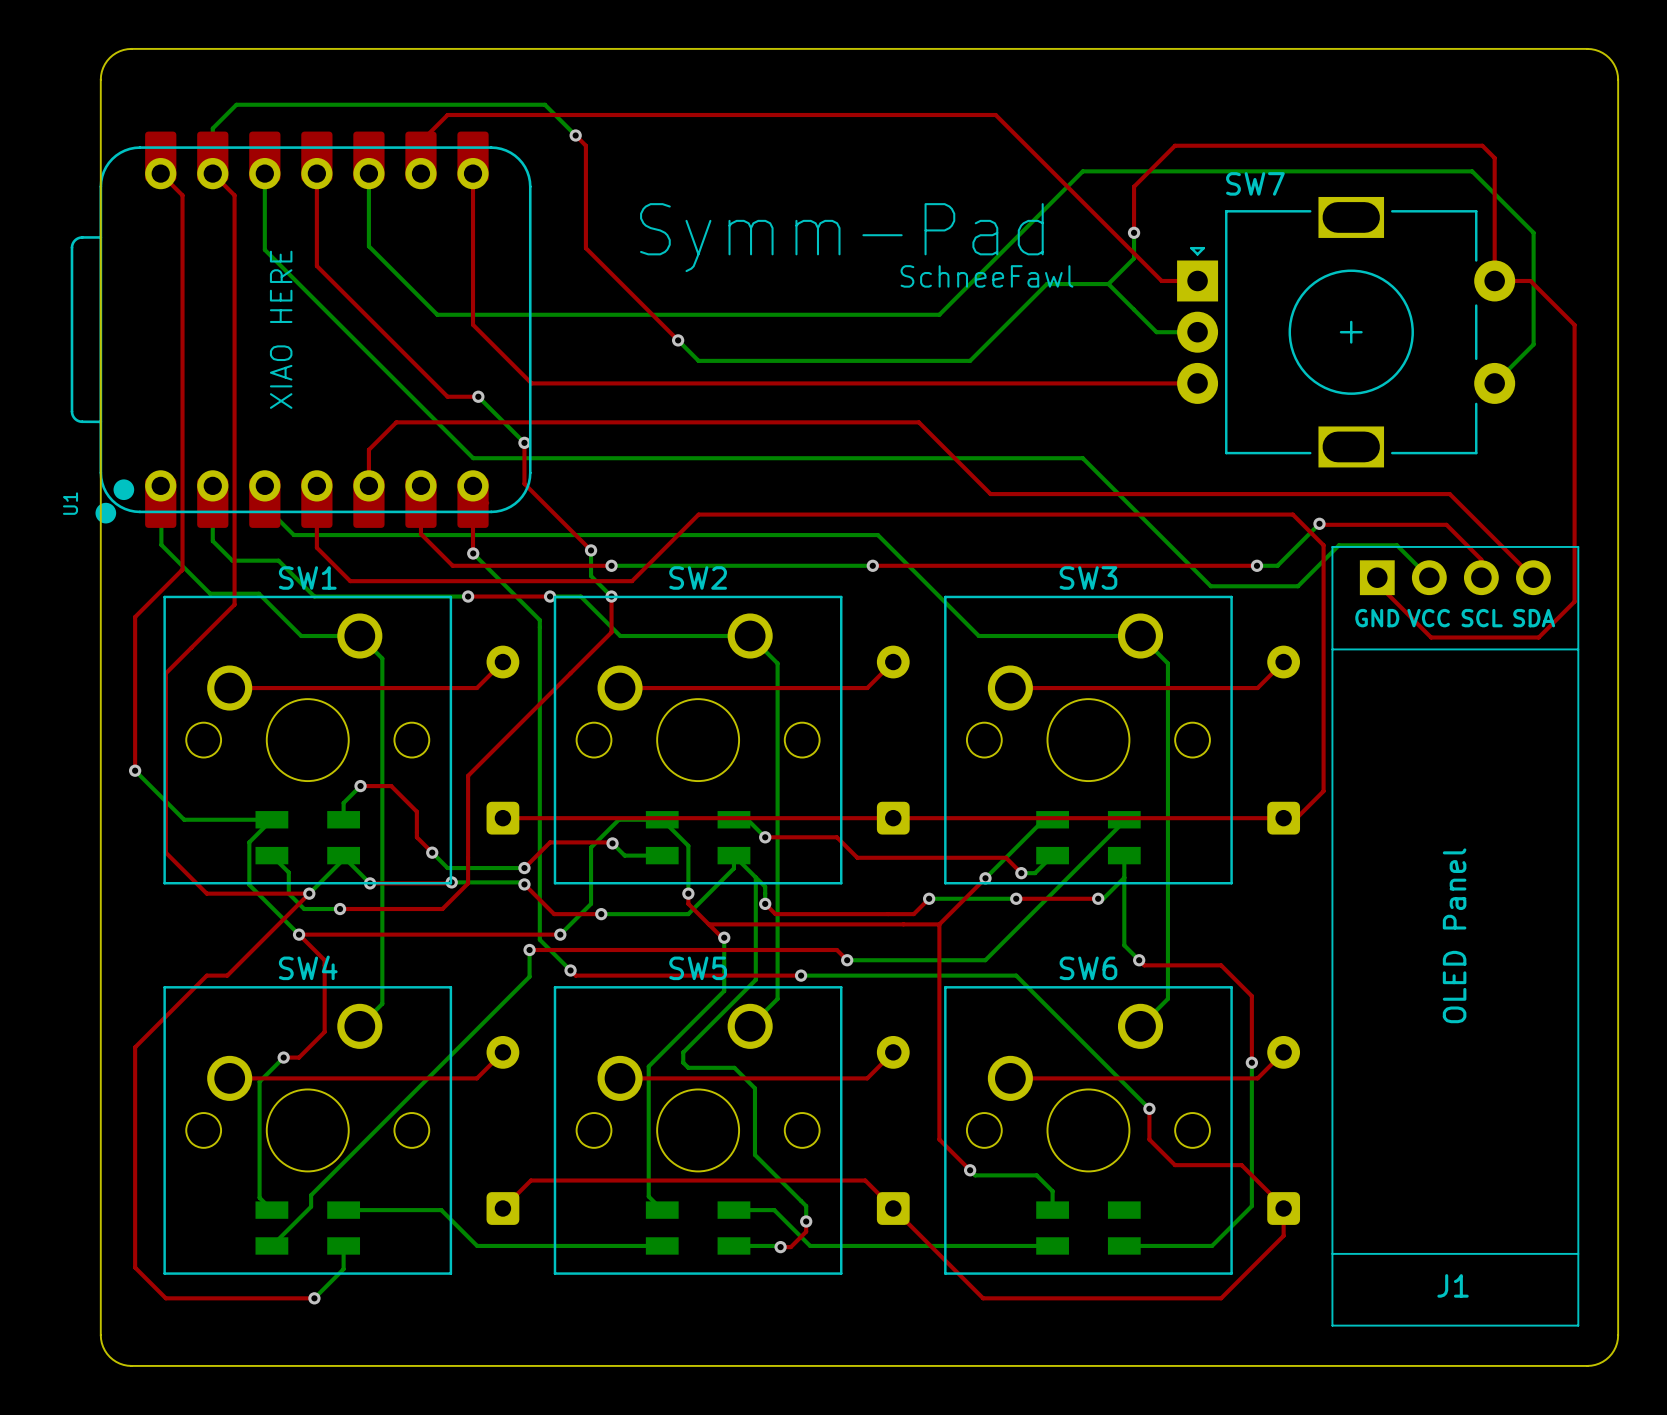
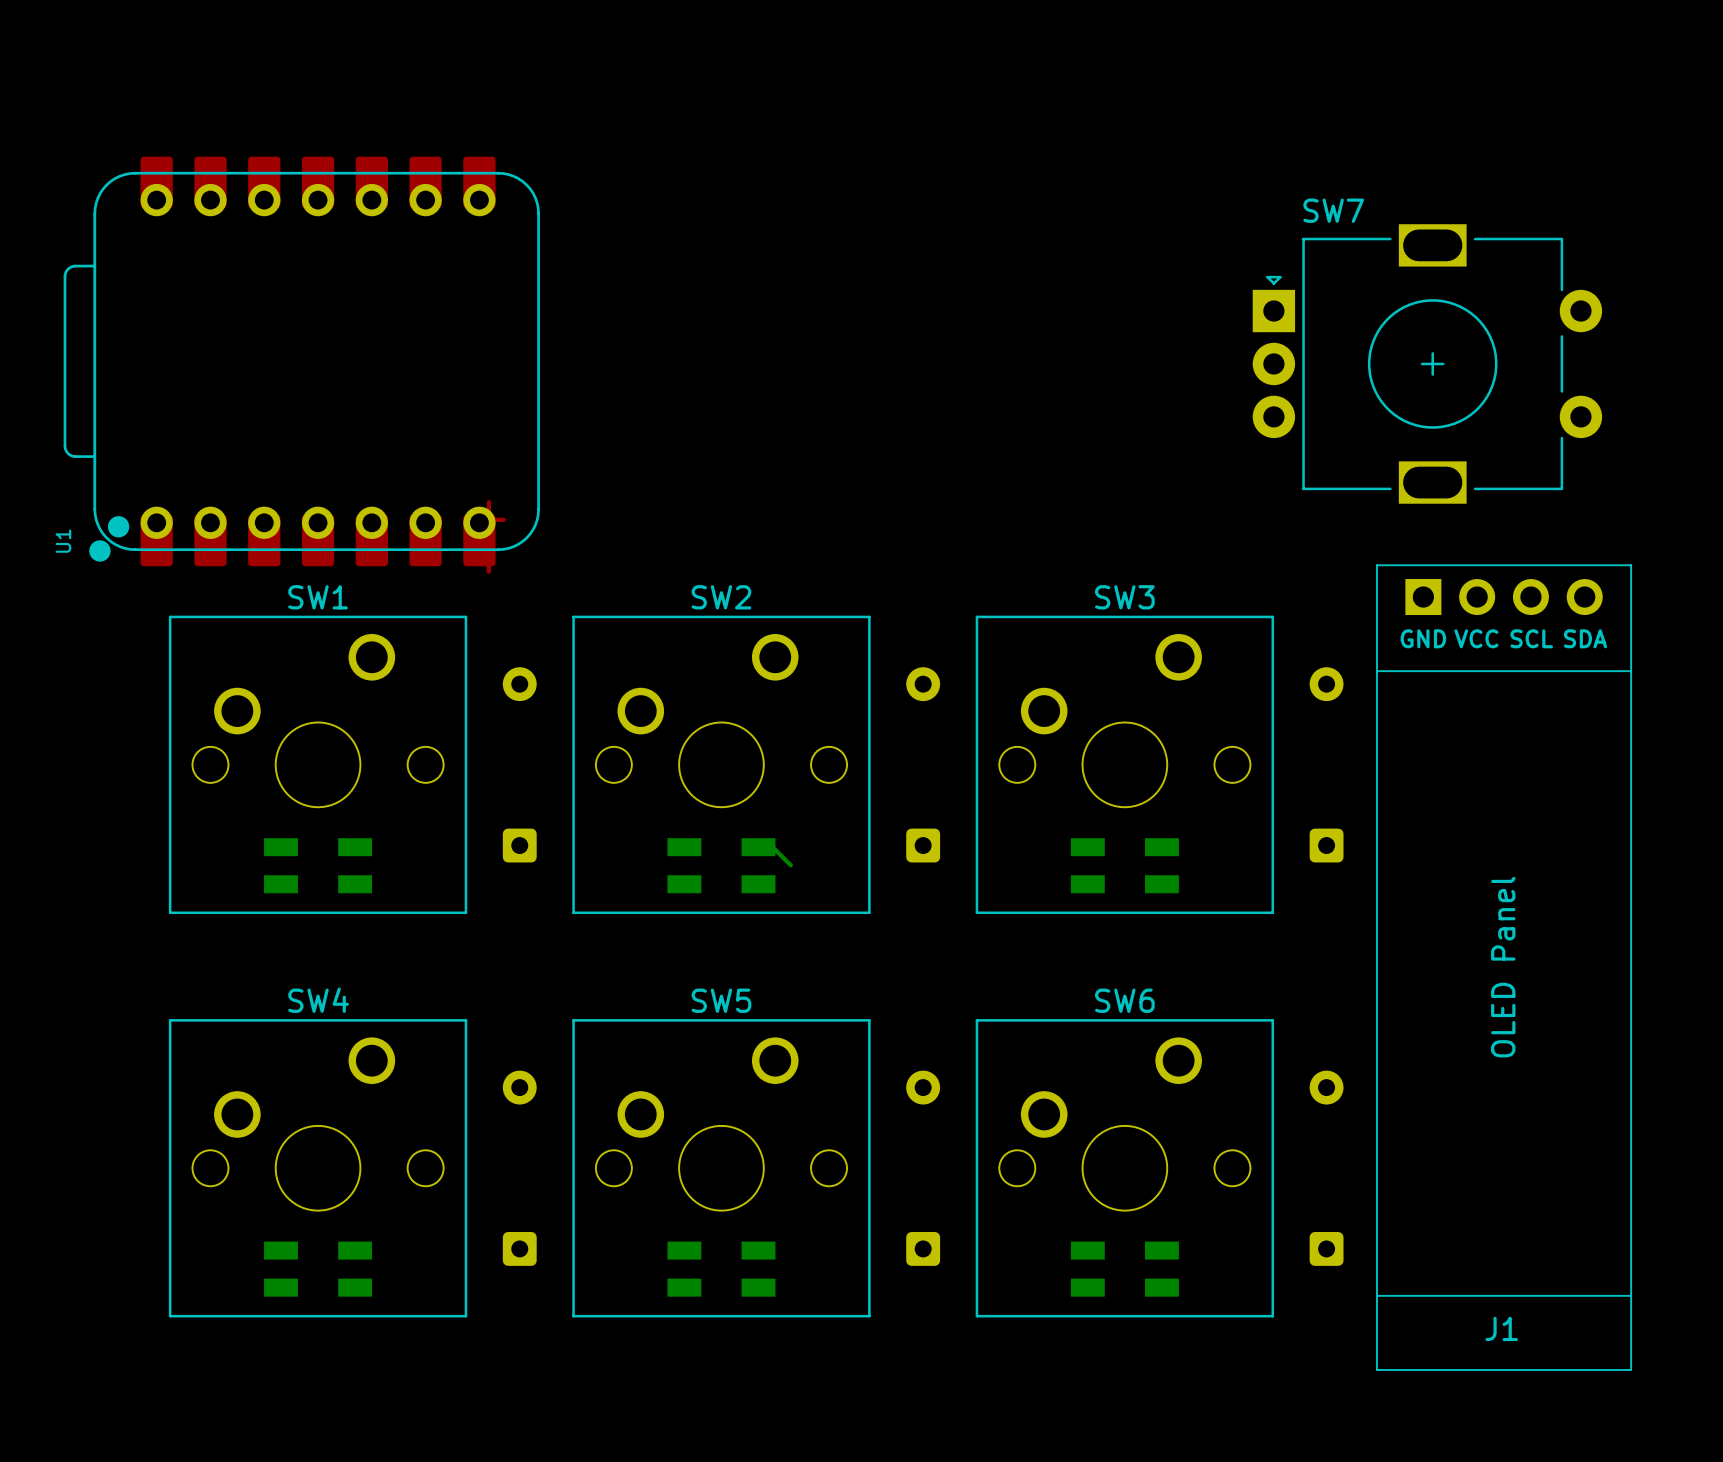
board edge: (131, 48) (1587, 48) (1599, 51) (1609, 57) (1615, 67) (1618, 79) (1618, 1335) (1615, 1346) (1609, 1356) (1599, 1363) (1587, 1365) (131, 1365) (119, 1363) (109, 1356) (103, 1346) (100, 1335) (100, 79) (103, 67) (109, 57) (119, 51) (131, 48) -> none
top track: (575, 135) (585, 145) (585, 248) (678, 340) -> none
bottom track: (575, 135) (544, 104) (236, 104) (212, 128) (212, 173) -> none
via: (575, 135) -> none
top track: (160, 173) (182, 195) (182, 569) (135, 617) (135, 770) -> none
top track: (212, 173) (234, 195) (234, 604) (165, 673) (165, 852) (206, 893) (309, 893) (227, 975) (206, 975) (135, 1047) (135, 1267) (165, 1298) (314, 1298) -> none
bottom track: (264, 173) (264, 249) (473, 458) (1082, 458) (1210, 586) (1297, 586) (1338, 545) (1396, 545) (1429, 577) -> none
top track: (316, 173) (316, 266) (447, 396) (478, 396) -> none
bottom track: (368, 173) (368, 246) (437, 314) (939, 314) (1082, 171) (1472, 171) (1533, 232) (1533, 344) (1494, 383) -> none
top track: (420, 173) (420, 141) (447, 115) (995, 115) (1161, 280) (1197, 280) -> none
top track: (473, 173) (473, 324) (531, 383) (1197, 383) -> none
top track: (1134, 232) (1134, 186) (1175, 145) (1482, 145) (1494, 158) (1494, 280) (1530, 280) (1574, 325) (1574, 601) (1538, 637) (1431, 637) (1377, 583) (1377, 577) -> none
bottom track: (1134, 232) (1134, 258) (1108, 284) -> none
via: (1134, 232) -> none
text: Symm-Pad (841, 237) -> none
text: SchneeFawl (986, 276) -> none
bottom track: (1108, 284) (1046, 284) (970, 360) (698, 360) (678, 340) -> none
bottom track: (1108, 284) (1156, 332) (1197, 332) -> none
text: XIAO HERE (281, 329) -> none
U1 position: (301, 329) -> (301, 361)
SW7 position: (1346, 332) -> (1427, 363)
via: (678, 340) -> none
bottom track: (478, 396) (524, 442) -> none
via: (478, 396) -> none
top track: (524, 442) (524, 483) (591, 550) -> none
via: (524, 442) -> none
bottom track: (212, 485) (212, 541) (232, 560) (278, 560) (314, 596) (468, 596) -> none
bottom track: (264, 485) (264, 505) (293, 535) (877, 535) (978, 636) (1140, 636) (1167, 663) (1167, 998) (1140, 1026) -> none
top track: (368, 485) (368, 449) (396, 422) (918, 422) (990, 494) (1449, 494) (1533, 577) -> none
bottom track: (161, 496) (161, 544) (210, 593) (258, 593) (301, 636) (359, 636) (382, 658) (382, 1003) (359, 1026) -> none
top track: (316, 502) (316, 547) (350, 581) (632, 581) (698, 514) (1292, 514) (1323, 545) (1323, 791) (1296, 818) (502, 818) -> none
top track: (420, 502) (420, 534) (452, 565) (611, 565) -> none
top track: (1319, 523) (1446, 524) (1481, 559) (1481, 577) -> none
bottom track: (1319, 523) (1277, 565) (1256, 565) -> none
via: (1319, 523) -> none
bottom track: (591, 550) (591, 576) (611, 596) -> none
via: (591, 550) -> none
bottom track: (473, 553) (539, 620) (539, 939) (570, 970) -> none
via: (473, 553) -> none
bottom track: (611, 565) (872, 565) -> none
via: (611, 565) -> none
top track: (872, 565) (1256, 565) -> none
via: (872, 565) -> none
via: (1256, 565) -> none
top track: (468, 596) (550, 596) -> none
via: (468, 596) -> none
bottom track: (550, 596) (580, 596) (620, 636) (750, 636) (777, 663) (777, 998) (750, 1026) -> none
via: (550, 596) -> none
top track: (611, 596) (611, 632) (468, 775) (468, 883) (442, 909) (340, 909) -> none
via: (611, 596) -> none
top track: (502, 662) (476, 688) (229, 688) -> none
top track: (893, 662) (867, 688) (620, 688) -> none
top track: (1283, 662) (1257, 688) (1010, 688) -> none
bottom track: (135, 770) (184, 819) (271, 819) (249, 842) (249, 884) (299, 934) -> none
via: (135, 770) -> none
top track: (360, 786) (391, 786) (416, 811) (416, 837) (432, 852) -> none
bottom track: (360, 786) (343, 802) (343, 819) -> none
via: (360, 786) -> none
bottom track: (1052, 819) (1044, 819) (985, 878) -> none
bottom track: (1124, 819) (985, 960) (847, 960) -> none
top track: (765, 837) (836, 837) (857, 857) (1005, 857) (1021, 873) -> none
via: (765, 837) -> none
top track: (612, 843) (550, 842) (524, 868) -> none
bottom track: (612, 843) (624, 855) (662, 855) -> none
via: (612, 843) -> none
bottom track: (432, 852) (447, 868) (524, 868) -> none
via: (432, 852) -> none
bottom track: (271, 855) (288, 872) (288, 893) (304, 909) (340, 909) -> none
bottom track: (343, 855) (343, 859) (309, 893) -> none
bottom track: (1052, 855) (1035, 873) (1021, 873) -> none
bottom track: (1124, 855) (1124, 945) (1139, 960) -> none
bottom track: (343, 856) (370, 883) -> none
via: (524, 868) -> none
via: (1021, 873) -> none
bottom track: (755, 877) (755, 979) (683, 1052) (683, 1062) (688, 1067) (734, 1067) (754, 1088) (754, 1154) (806, 1206) (806, 1221) -> none
bottom track: (1124, 877) (1103, 898) (1098, 898) -> none
top track: (985, 878) (939, 924) -> none
via: (985, 878) -> none
top track: (451, 882) (370, 883) -> none
bottom track: (451, 882) (522, 882) (524, 884) -> none
via: (451, 882) -> none
via: (370, 883) -> none
top track: (524, 884) (554, 914) (601, 914) -> none
via: (524, 884) -> none
via: (309, 893) -> none
top track: (688, 893) (688, 903) (724, 937) -> none
bottom track: (688, 893) (688, 845) (662, 819) (618, 819) (591, 847) (591, 903) (560, 934) -> none
via: (688, 893) -> none
top track: (929, 898) (913, 914) (775, 914) (765, 903) -> none
bottom track: (929, 898) (1016, 898) -> none
via: (929, 898) -> none
top track: (1016, 898) (1098, 898) -> none
via: (1016, 898) -> none
via: (1098, 898) -> none
bottom track: (765, 903) (765, 886) (733, 855) (733, 868) (688, 914) (601, 914) -> none
via: (765, 903) -> none
via: (340, 909) -> none
via: (601, 914) -> none
top track: (708, 924) (939, 924) -> none
top track: (939, 924) (939, 1139) (970, 1170) -> none
via: (299, 934) -> none
top track: (560, 934) (299, 934) (324, 960) (324, 1031) (299, 1057) (283, 1057) -> none
via: (560, 934) -> none
bottom track: (724, 937) (724, 990) (648, 1066) (648, 1196) (662, 1210) -> none
via: (724, 937) -> none
top track: (529, 949) (836, 949) (847, 960) -> none
bottom track: (529, 949) (529, 976) (311, 1195) (311, 1206) (271, 1245) -> none
via: (529, 949) -> none
via: (847, 960) -> none
top track: (1139, 960) (1144, 965) (1221, 965) (1251, 996) (1251, 1062) -> none
via: (1139, 960) -> none
top track: (570, 970) (575, 975) (801, 975) -> none
via: (570, 970) -> none
bottom track: (801, 975) (1016, 975) (1149, 1108) -> none
via: (801, 975) -> none
top track: (502, 1052) (476, 1078) (229, 1078) -> none
top track: (893, 1052) (867, 1078) (620, 1078) -> none
top track: (1283, 1052) (1257, 1078) (1010, 1078) -> none
bottom track: (283, 1057) (259, 1081) (259, 1197) (271, 1210) -> none
via: (283, 1057) -> none
bottom track: (1251, 1062) (1251, 1206) (1212, 1245) (1124, 1245) -> none
via: (1251, 1062) -> none
top track: (1149, 1108) (1149, 1139) (1175, 1165) (1241, 1165) (1283, 1207) (1283, 1235) (1221, 1298) (983, 1298) (865, 1180) (530, 1180) (502, 1208) -> none
via: (1149, 1108) -> none
bottom track: (970, 1170) (975, 1175) (1036, 1175) (1052, 1191) (1052, 1210) -> none
via: (970, 1170) -> none
bottom track: (343, 1210) (441, 1210) (477, 1245) (662, 1245) -> none
bottom track: (733, 1210) (774, 1210) (810, 1245) (1052, 1245) -> none
top track: (806, 1221) (806, 1231) (790, 1247) (780, 1247) -> none
via: (806, 1221) -> none
bottom track: (343, 1245) (343, 1269) (314, 1298) -> none
bottom track: (733, 1245) (780, 1247) -> none
via: (780, 1247) -> none
via: (314, 1298) -> none

